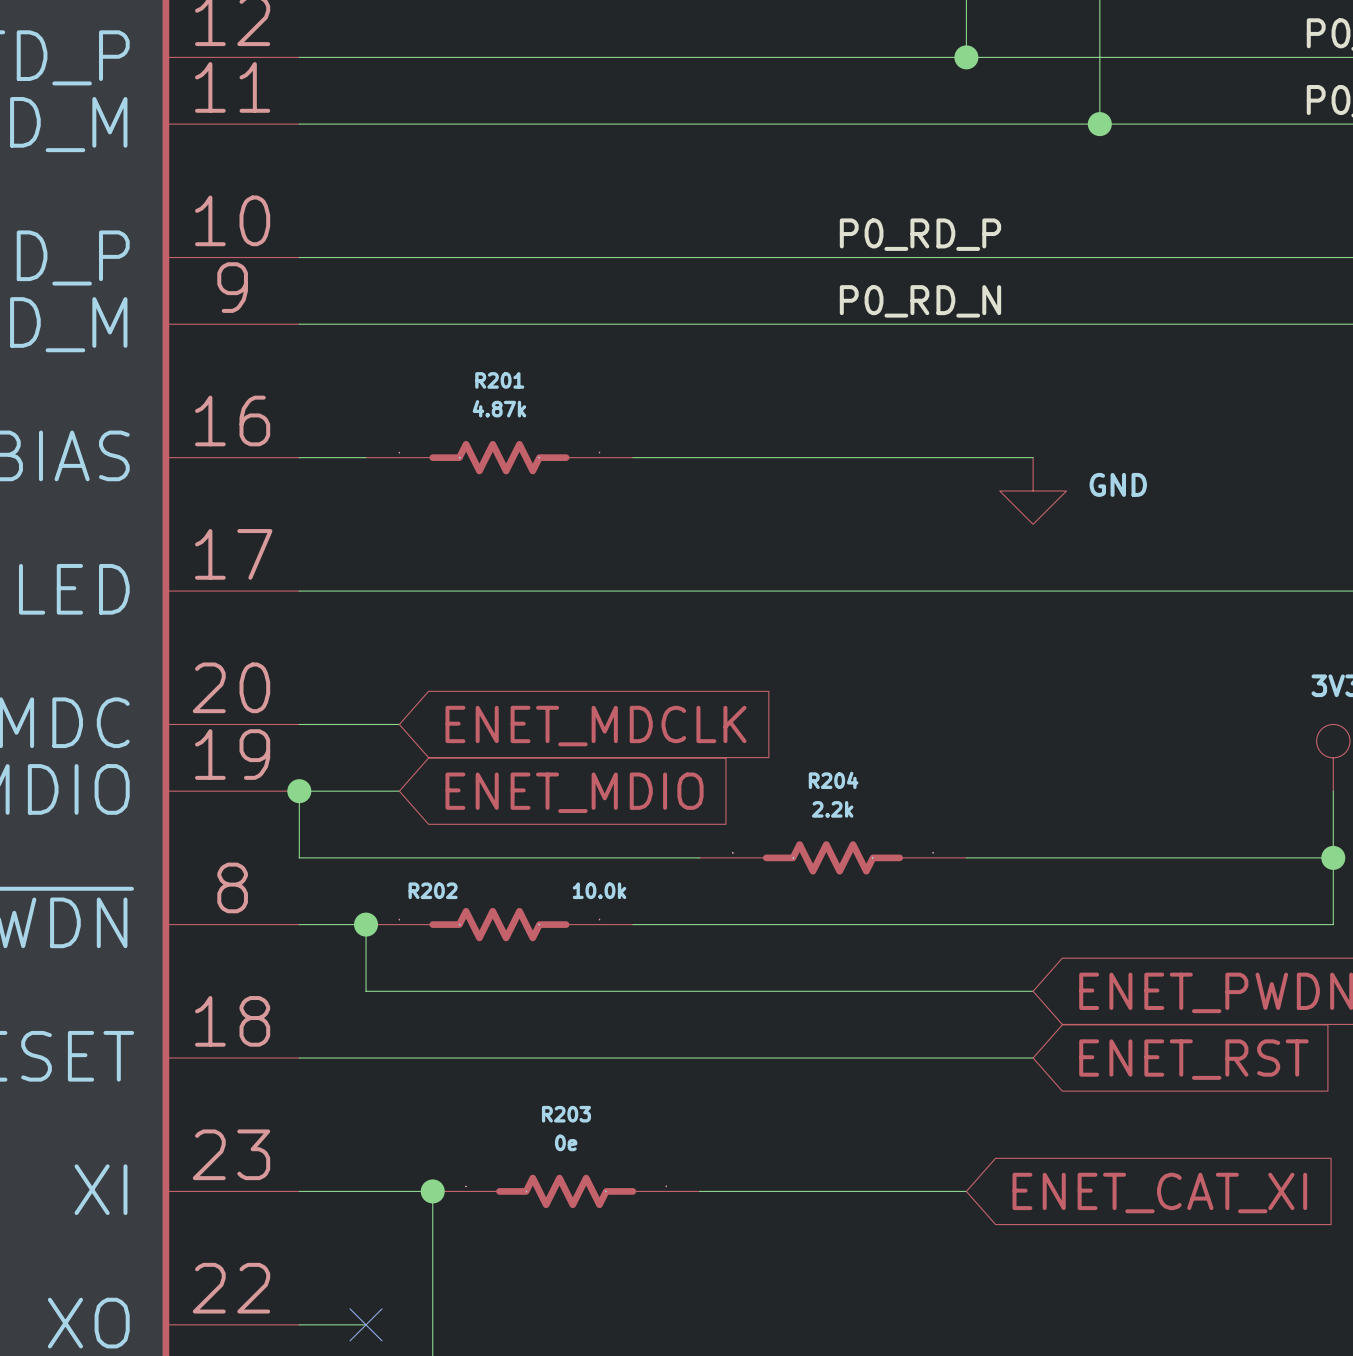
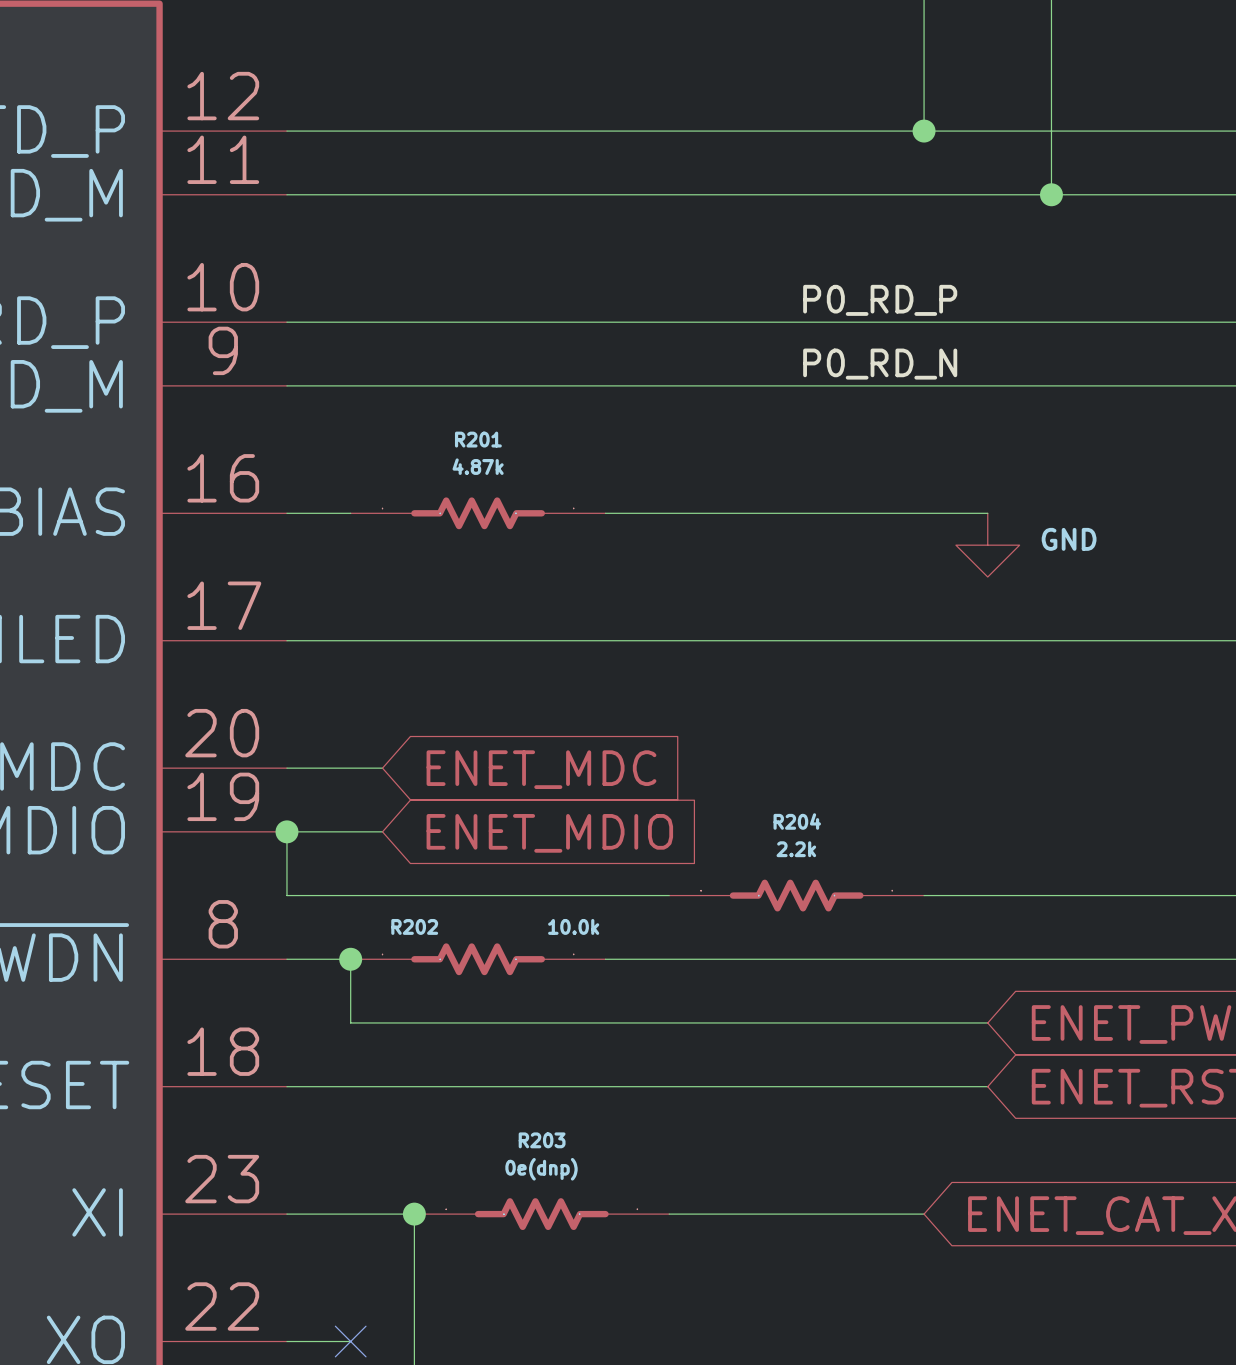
global label: ENET_MDCLK (595, 726) -> ENET_MDC (541, 769)
R203 value: 0e (566, 1142) -> 0e(dnp) (541, 1169)

